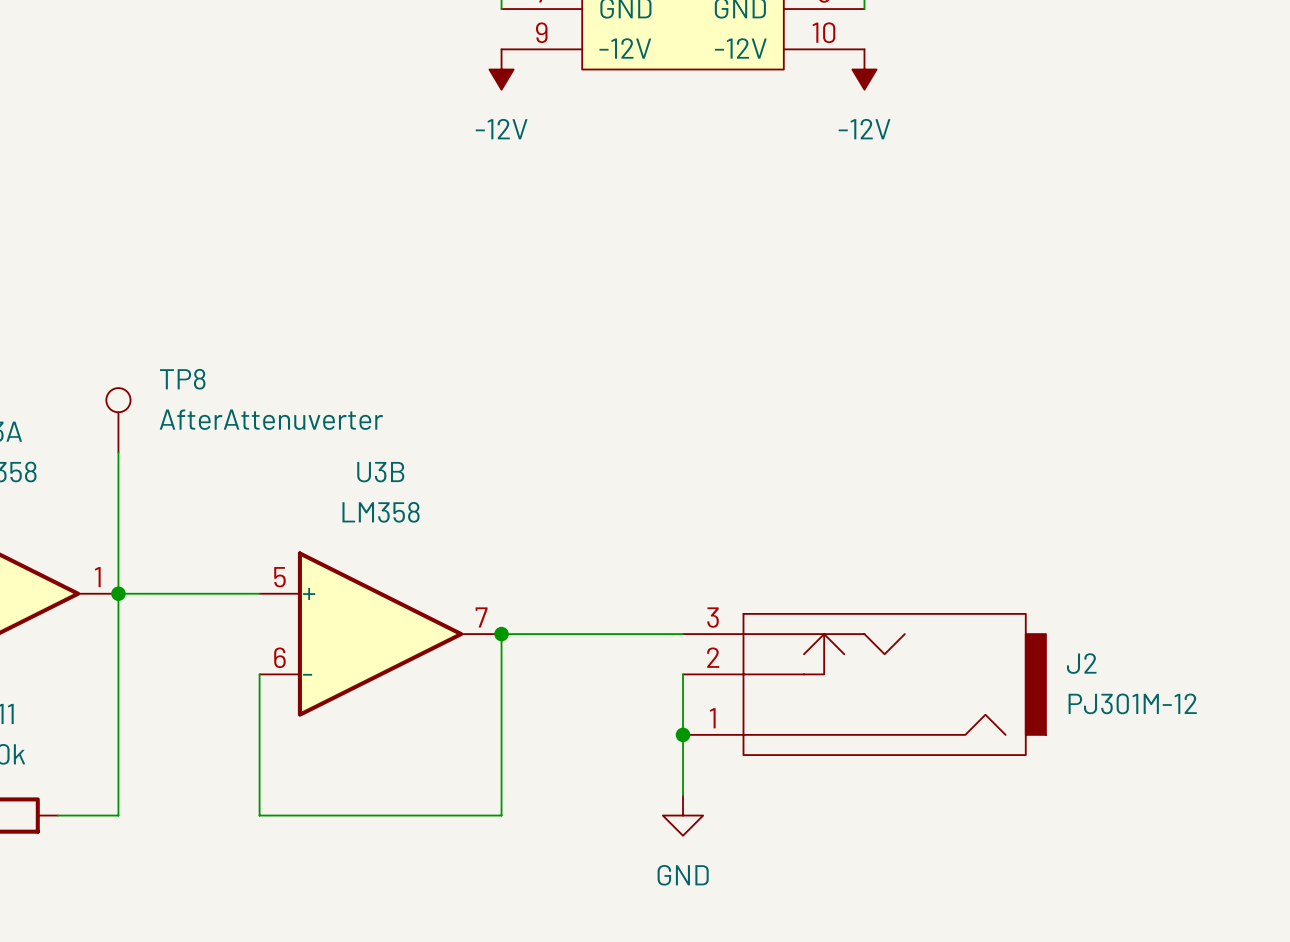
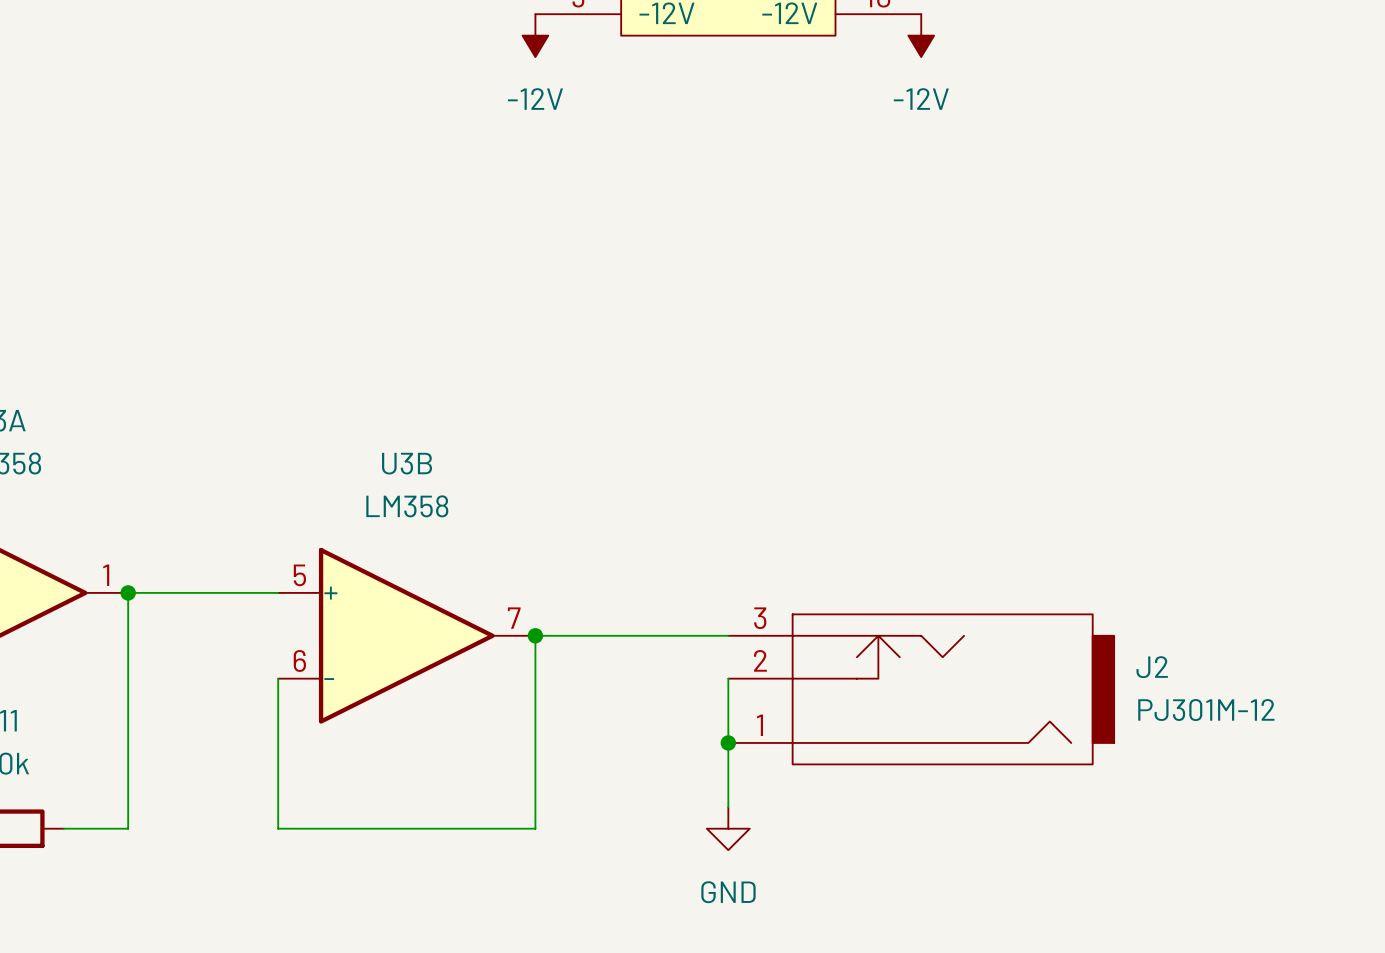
TP8: AfterAttenuverter (118, 420) -> none
wire: (118, 452) (118, 593) -> none

